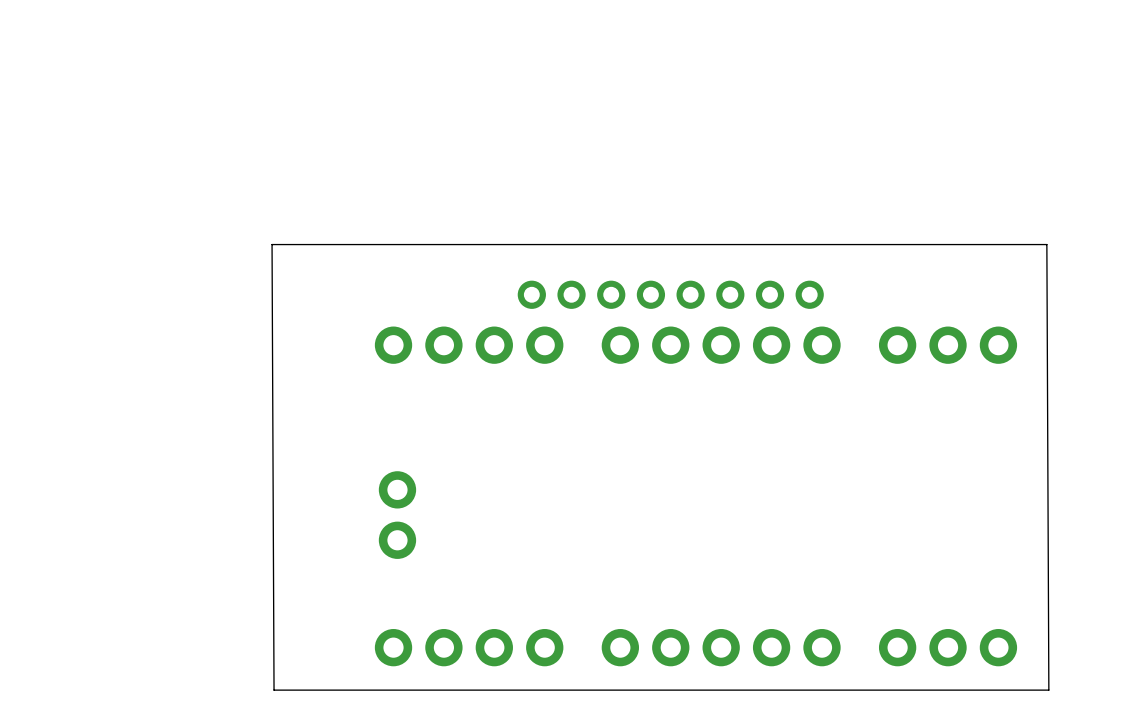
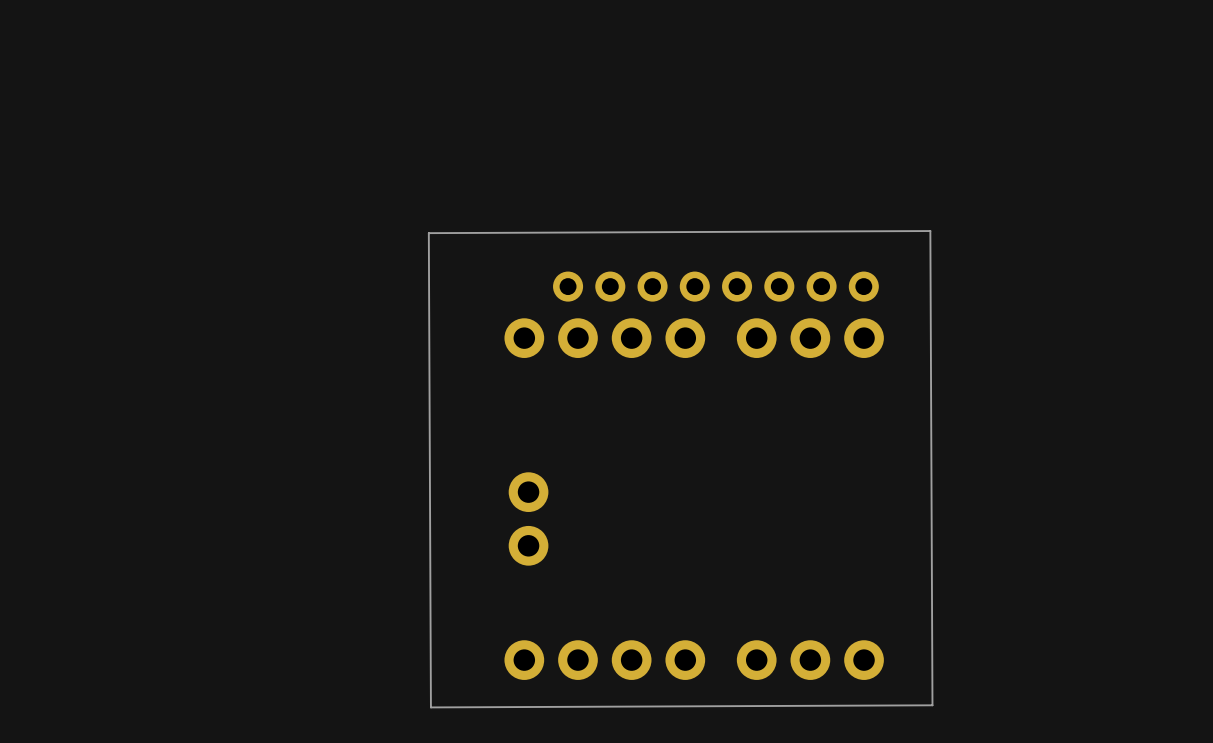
board edge: (1046, 244) (272, 244) (274, 690) (1048, 690) (1046, 244) -> (930, 231) (932, 705) (430, 707) (428, 233) (930, 231)
part: none -> (810, 338)
part position: (469, 345) -> (604, 338)
part: (721, 345) -> none
part: (948, 345) -> none
part position: (397, 515) -> (528, 518)
part: none -> (810, 660)
part position: (469, 647) -> (604, 660)
part: (721, 647) -> none
part: (948, 647) -> none

